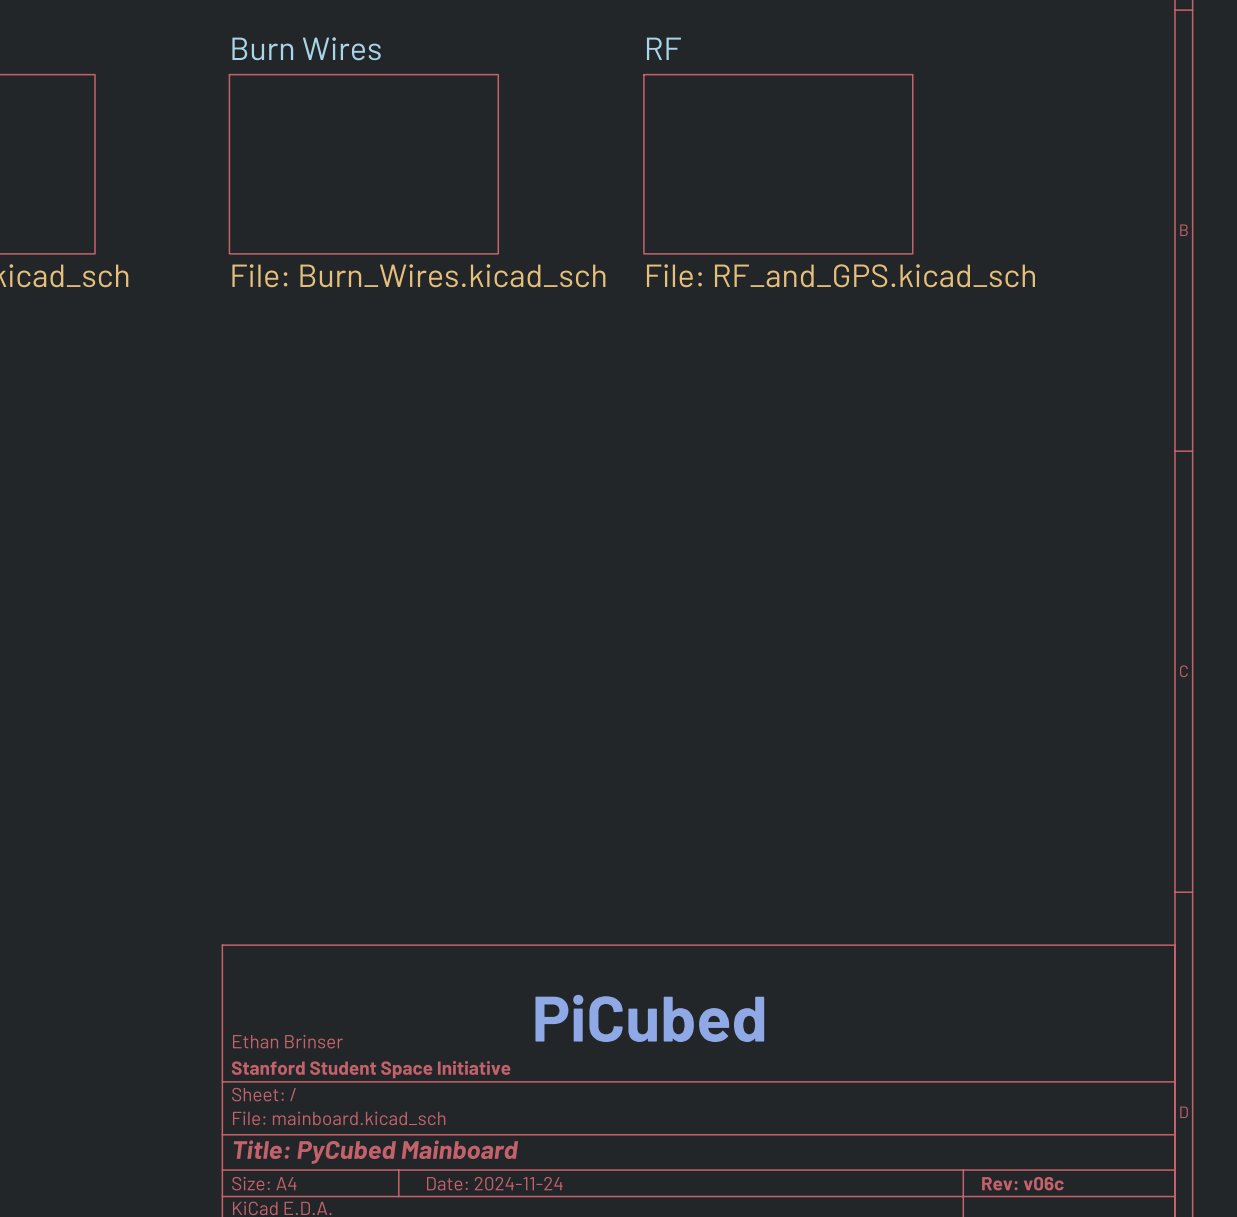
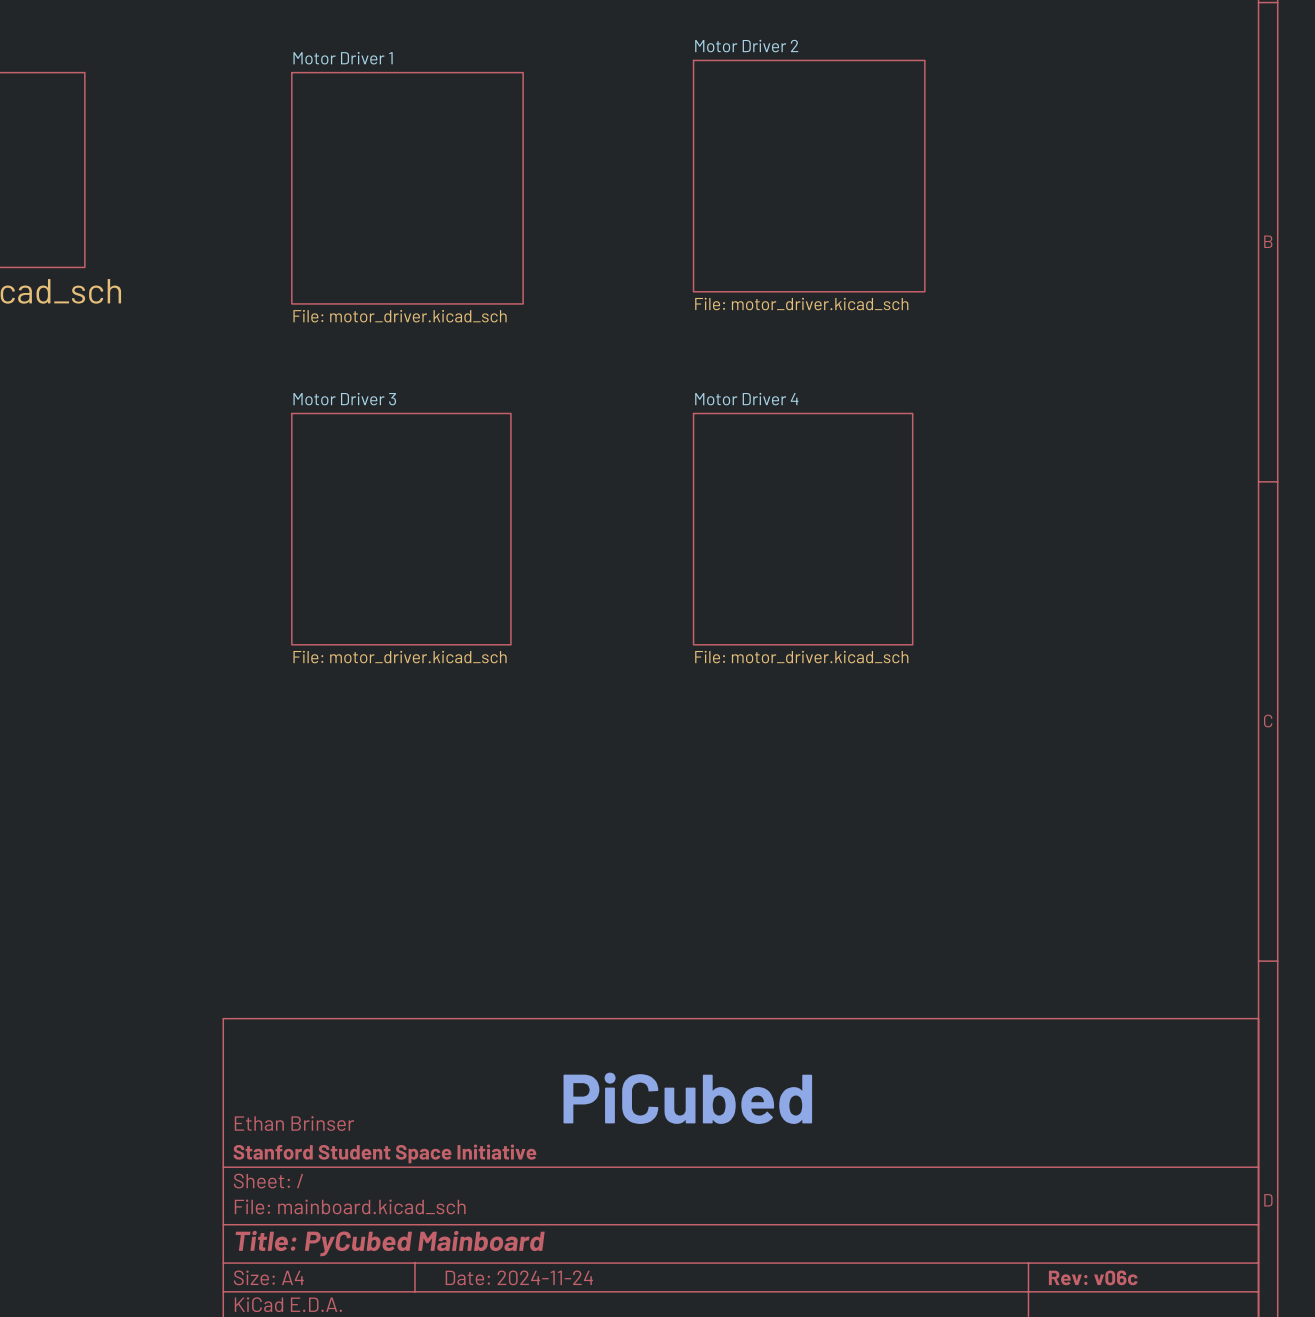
sheet Burn Wires: File: Burn_Wires.kicad_sch (363, 164) -> none
sheet RF: File: RF_and_GPS.kicad_sch (778, 164) -> none
sheet Motor Driver 2: none -> File: motor_driver.kicad_sch (809, 176)
sheet Motor Driver 1: none -> File: motor_driver.kicad_sch (407, 188)
sheet Motor Driver 3: none -> File: motor_driver.kicad_sch (401, 529)
sheet Motor Driver 4: none -> File: motor_driver.kicad_sch (803, 529)

